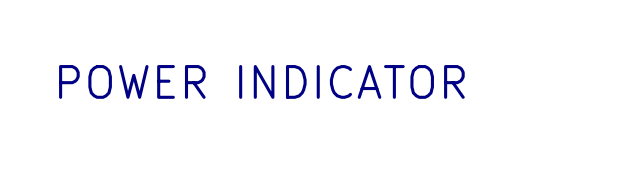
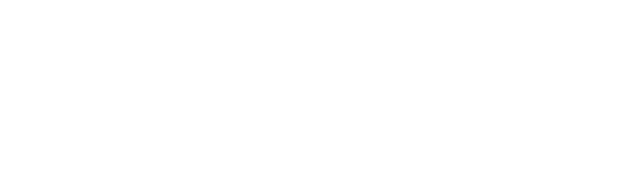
text: POWER INDICATOR (261, 81) -> none

